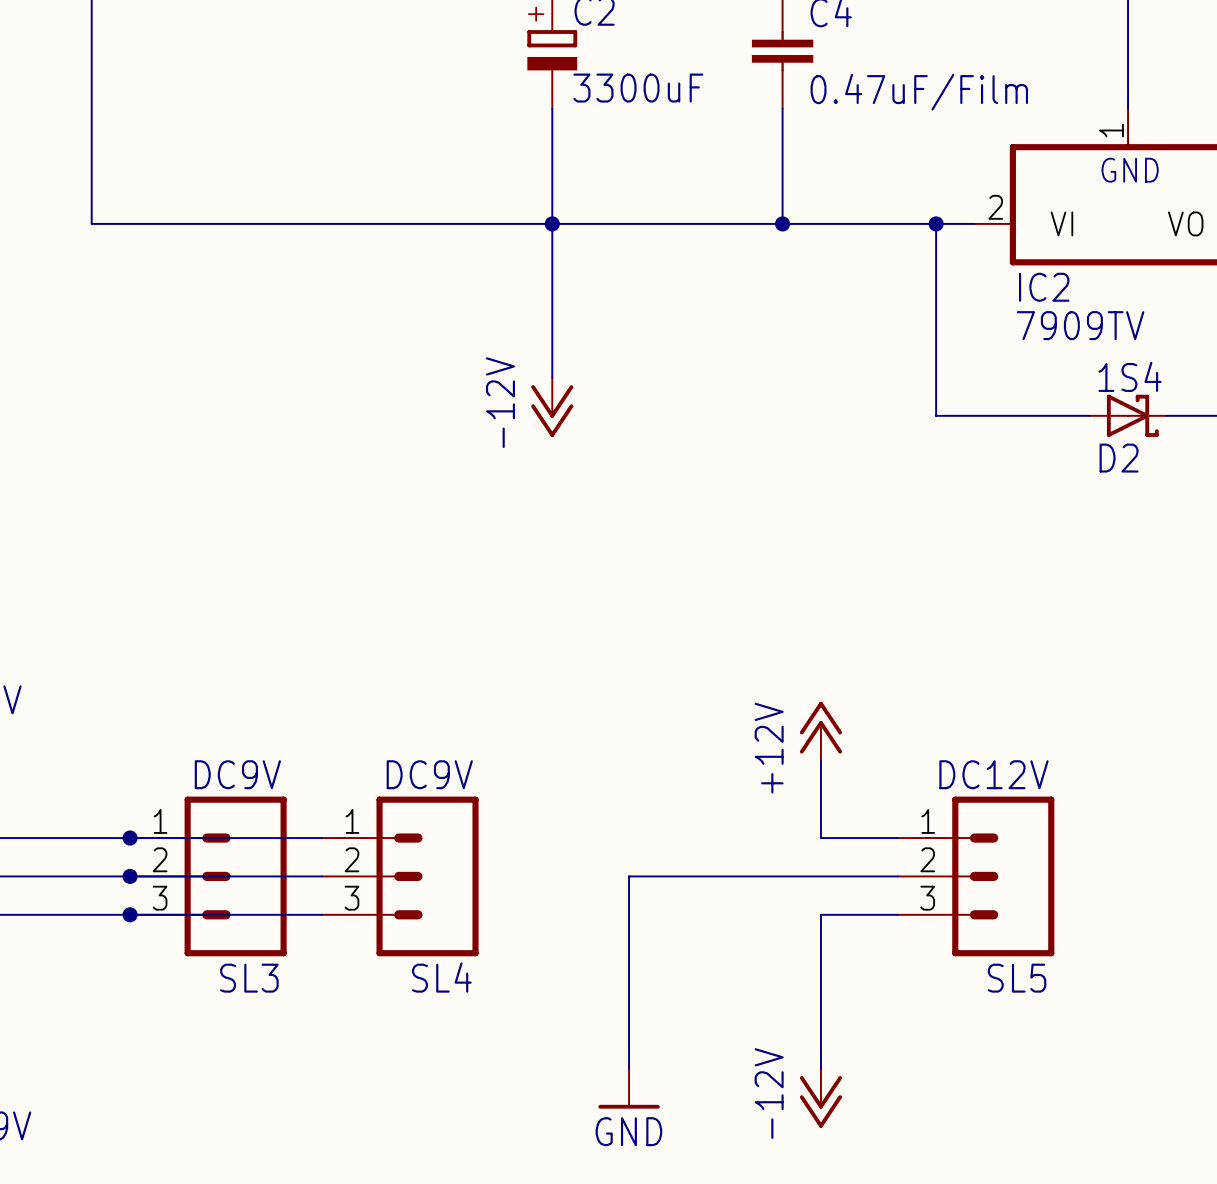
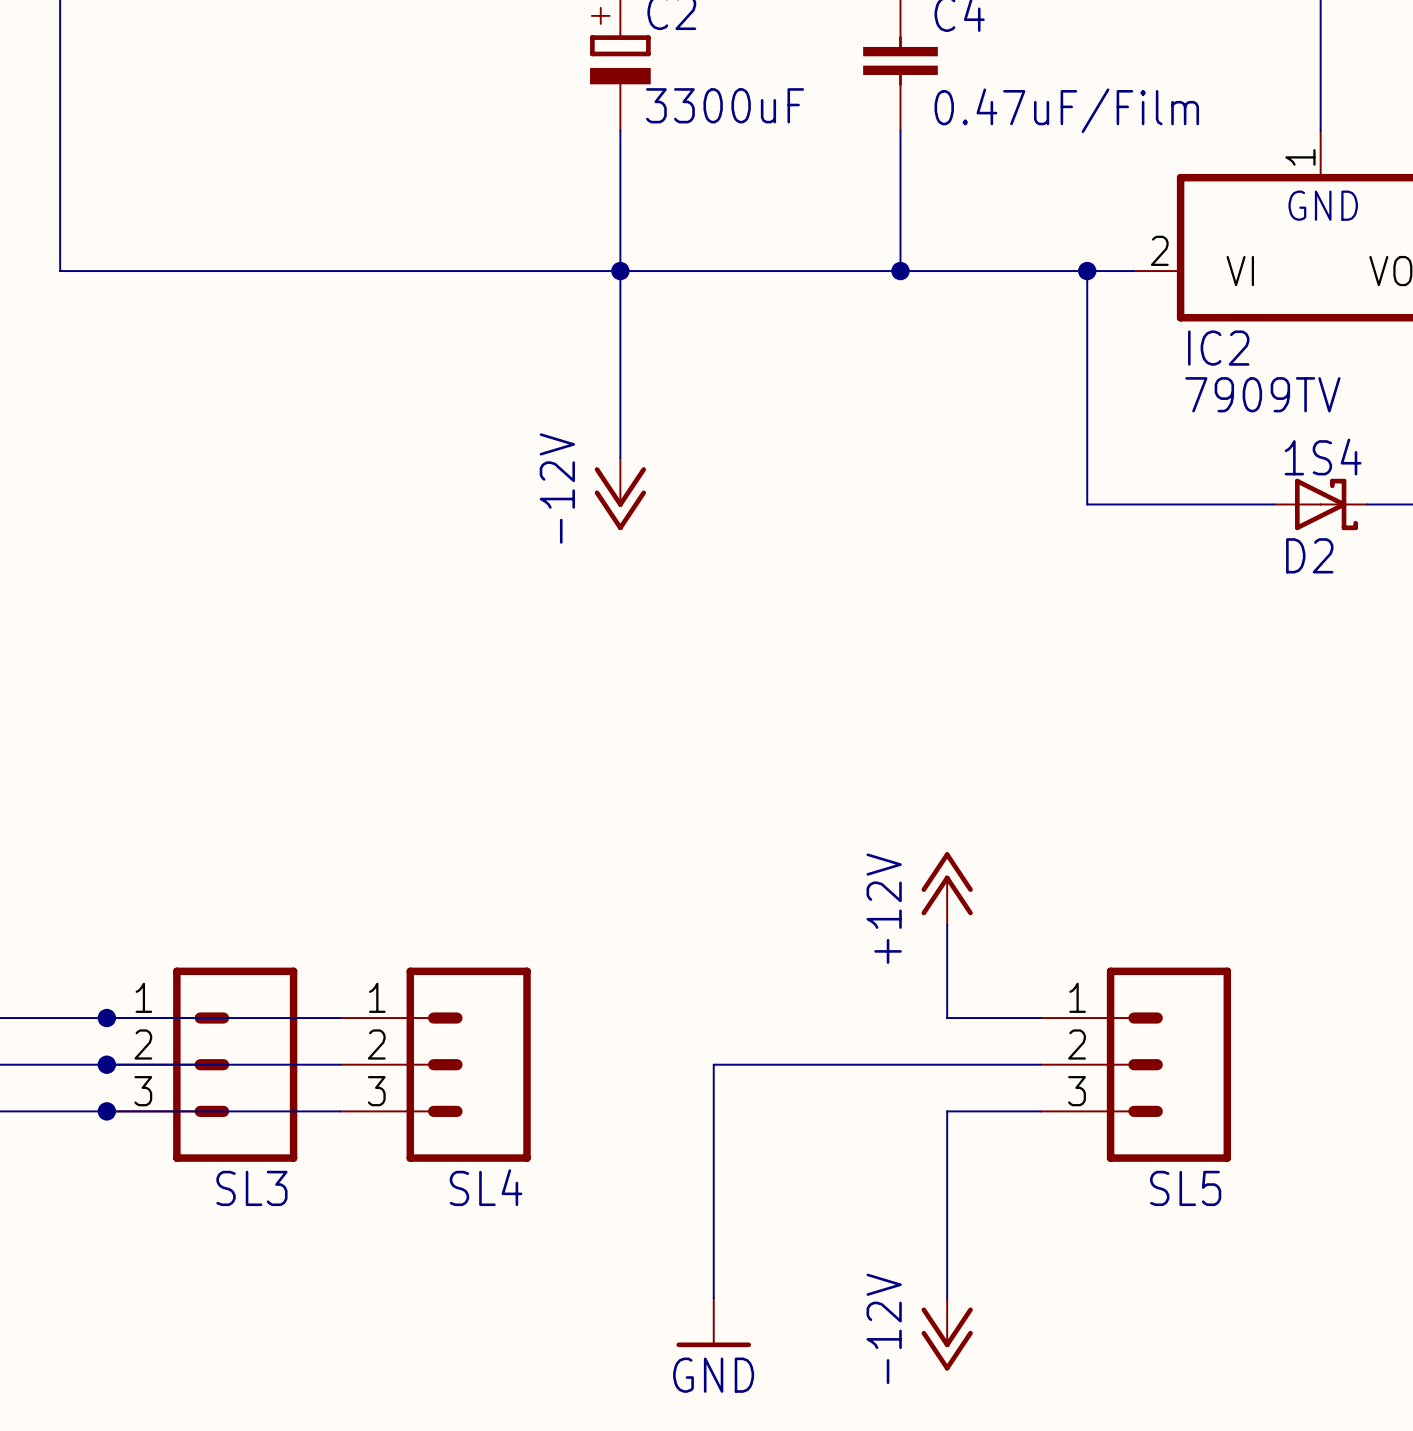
SL3 value: DC9V (237, 774) -> none
SL4 value: DC9V (429, 774) -> none
SL5 value: DC12V (994, 774) -> none

